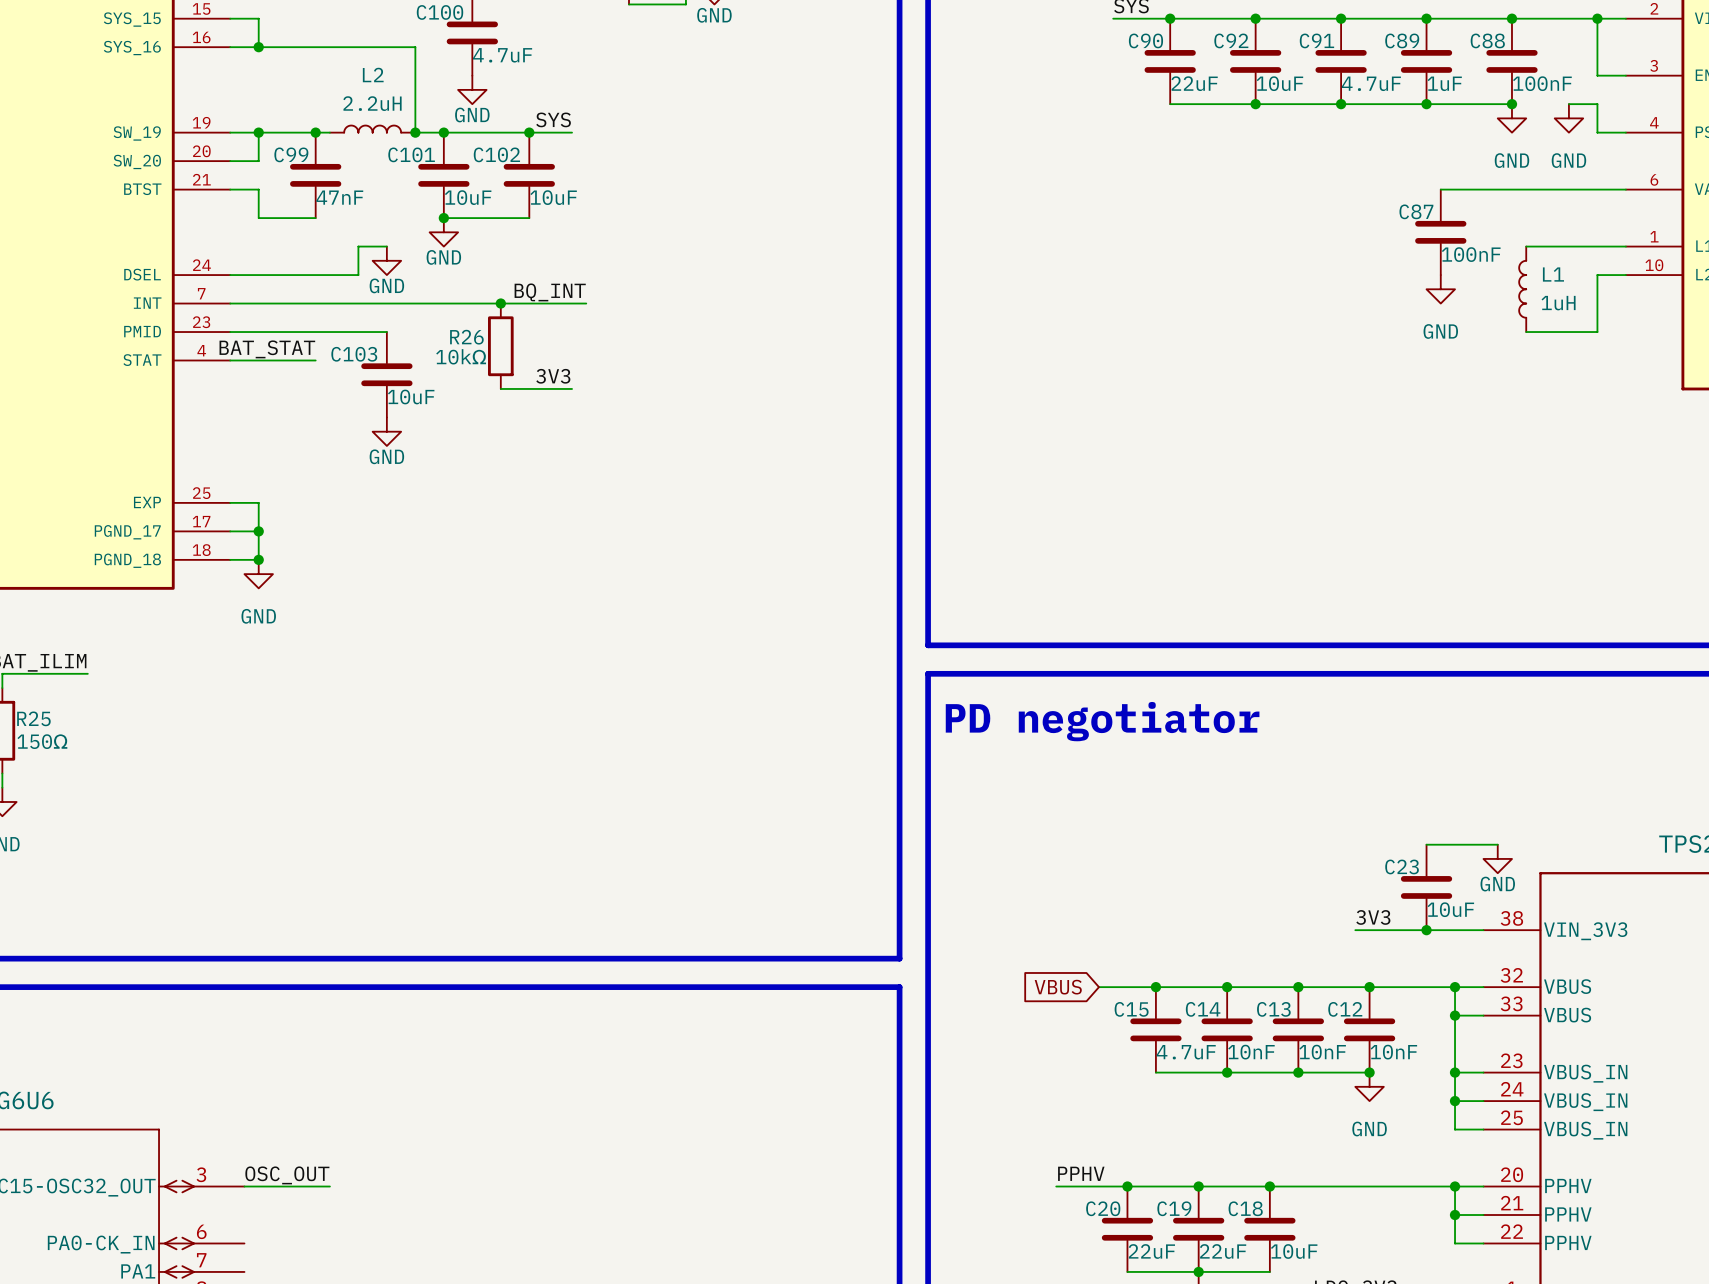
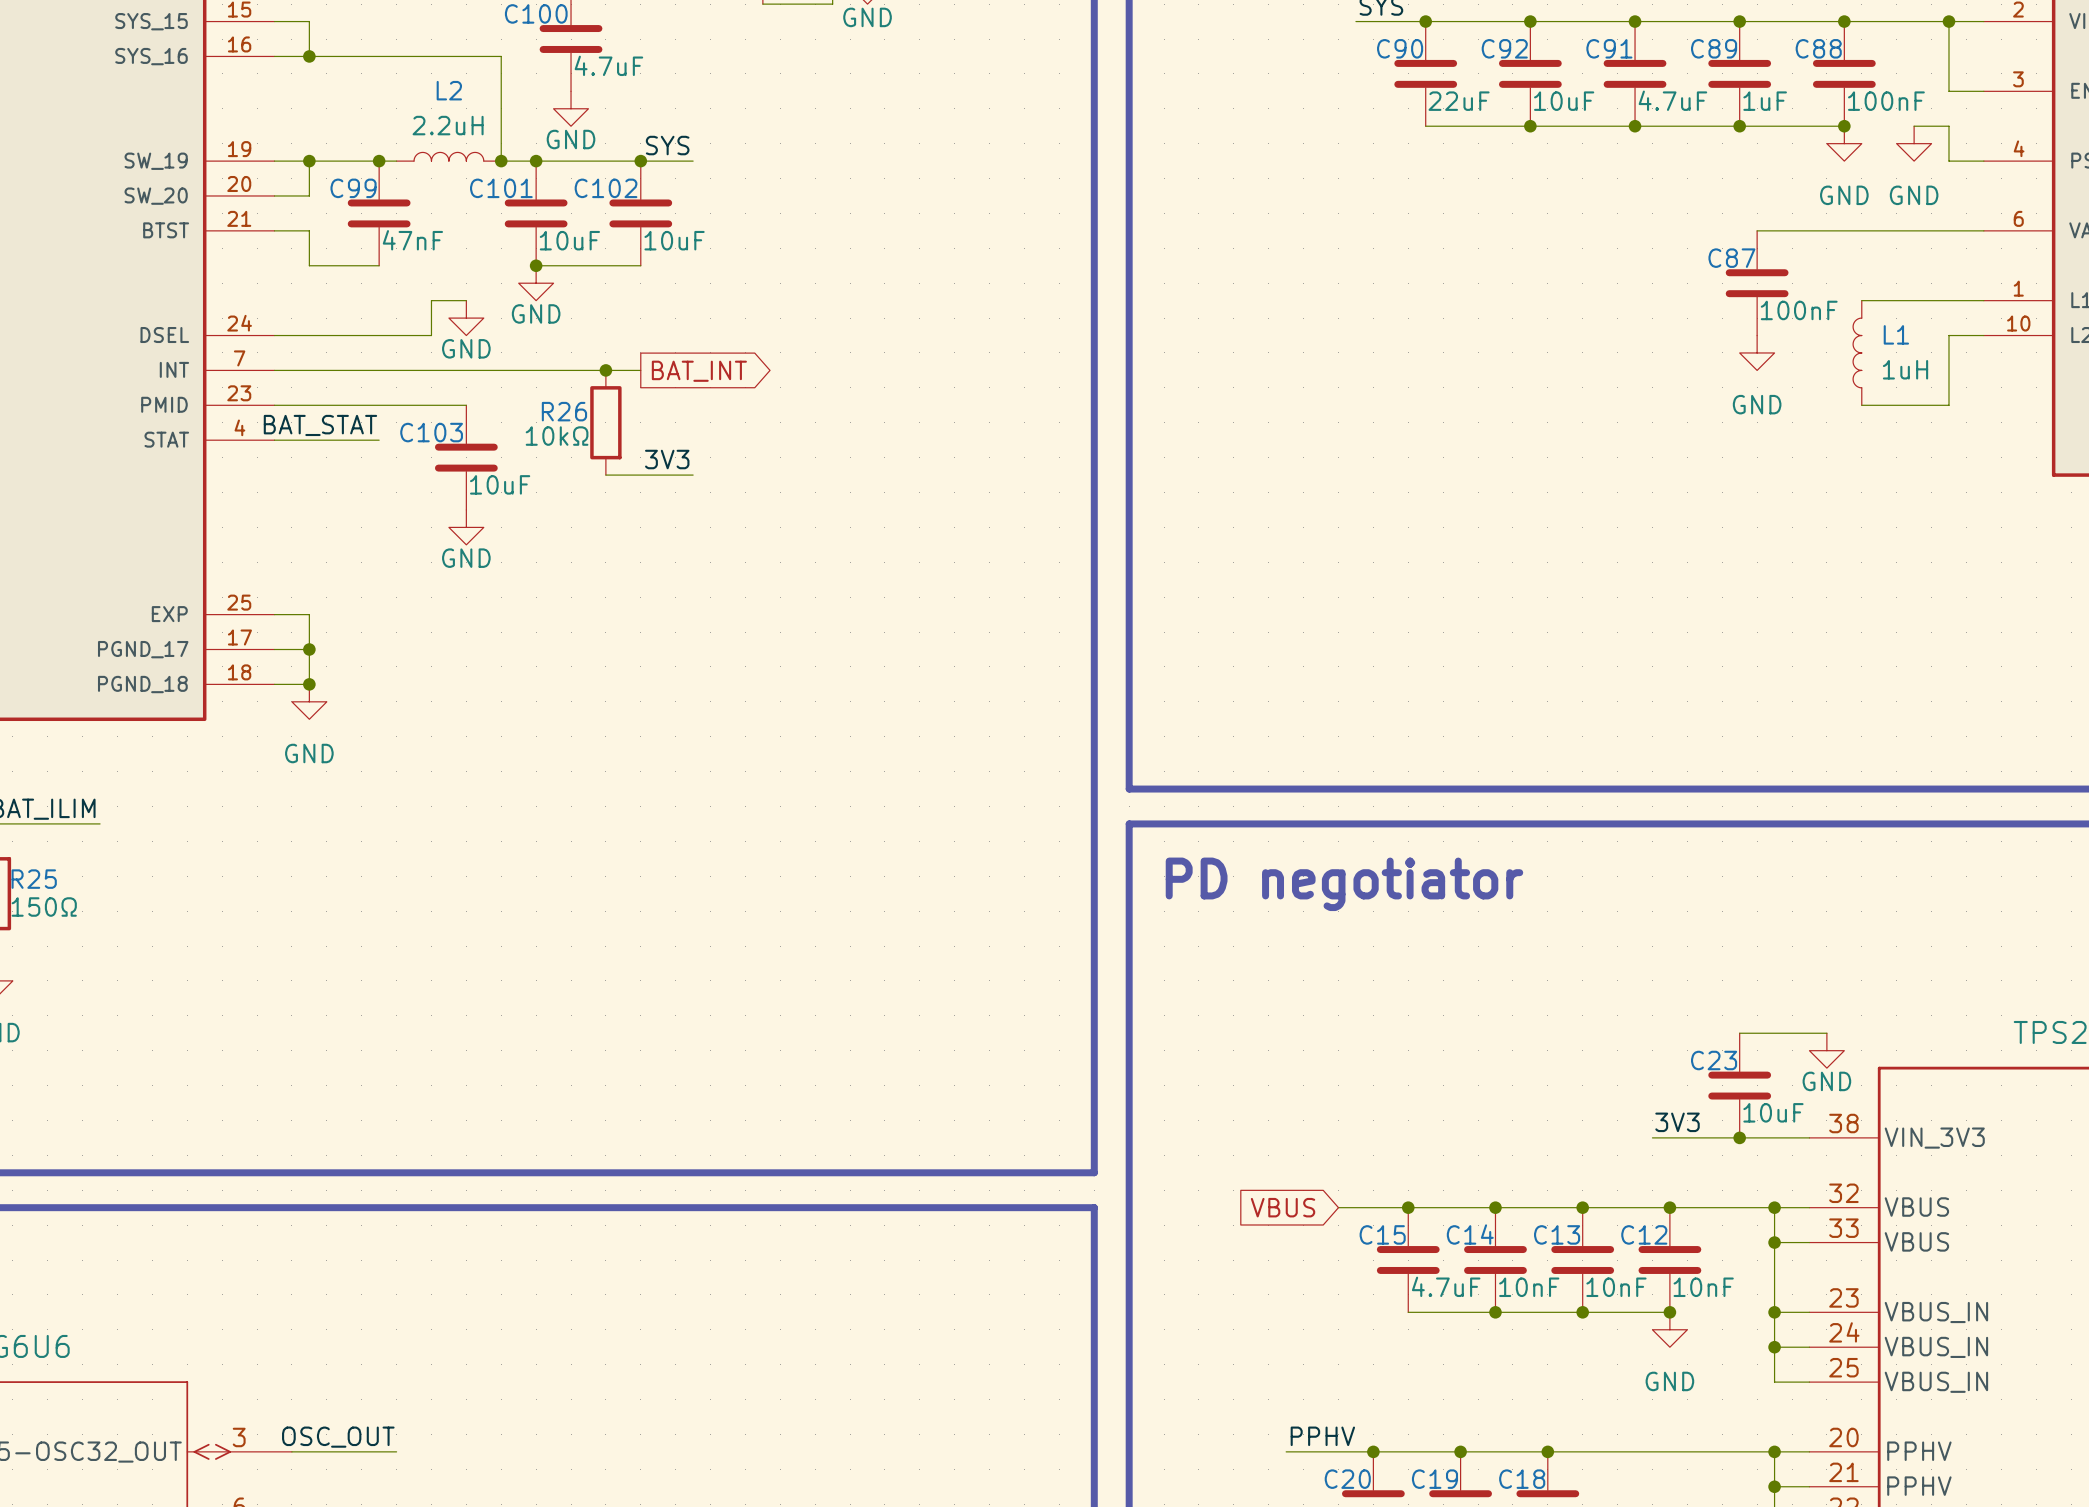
label: BQ_INT (550, 292) -> none
wire: (529, 303) (586, 303) -> none
global label: none -> BAT_INT (699, 371)

